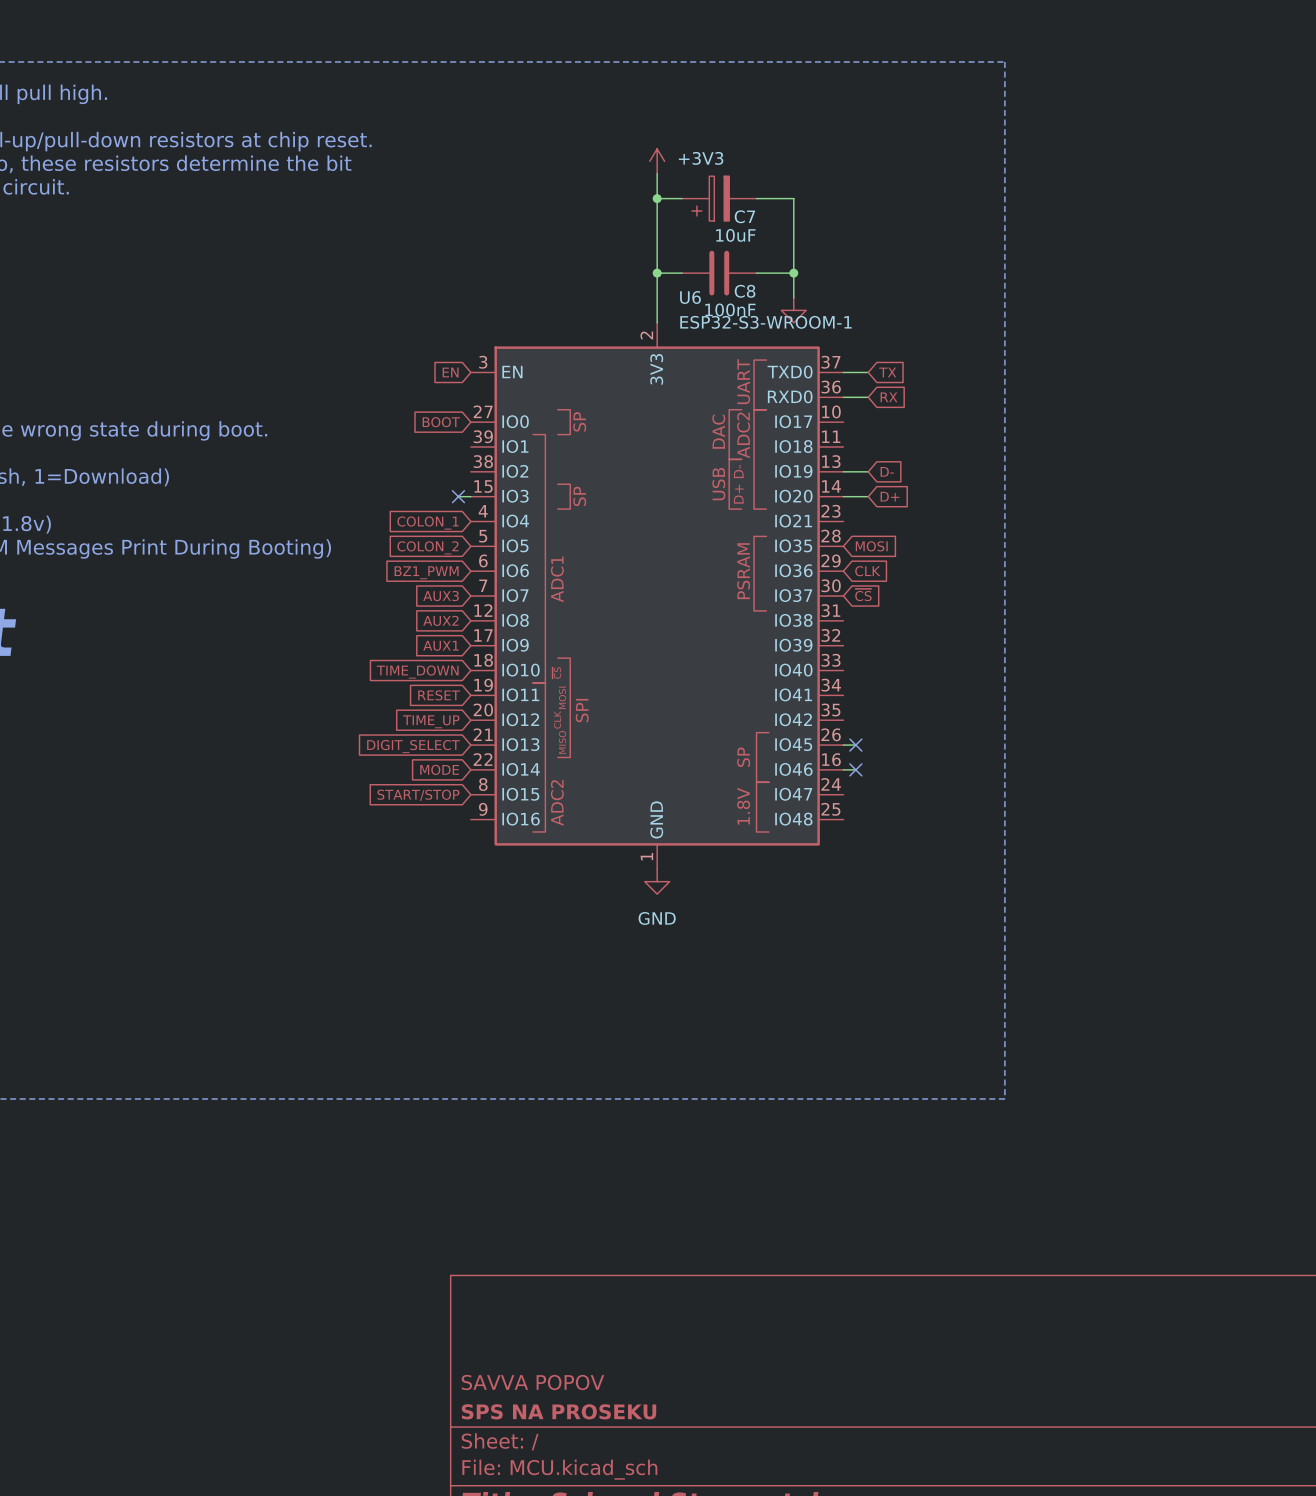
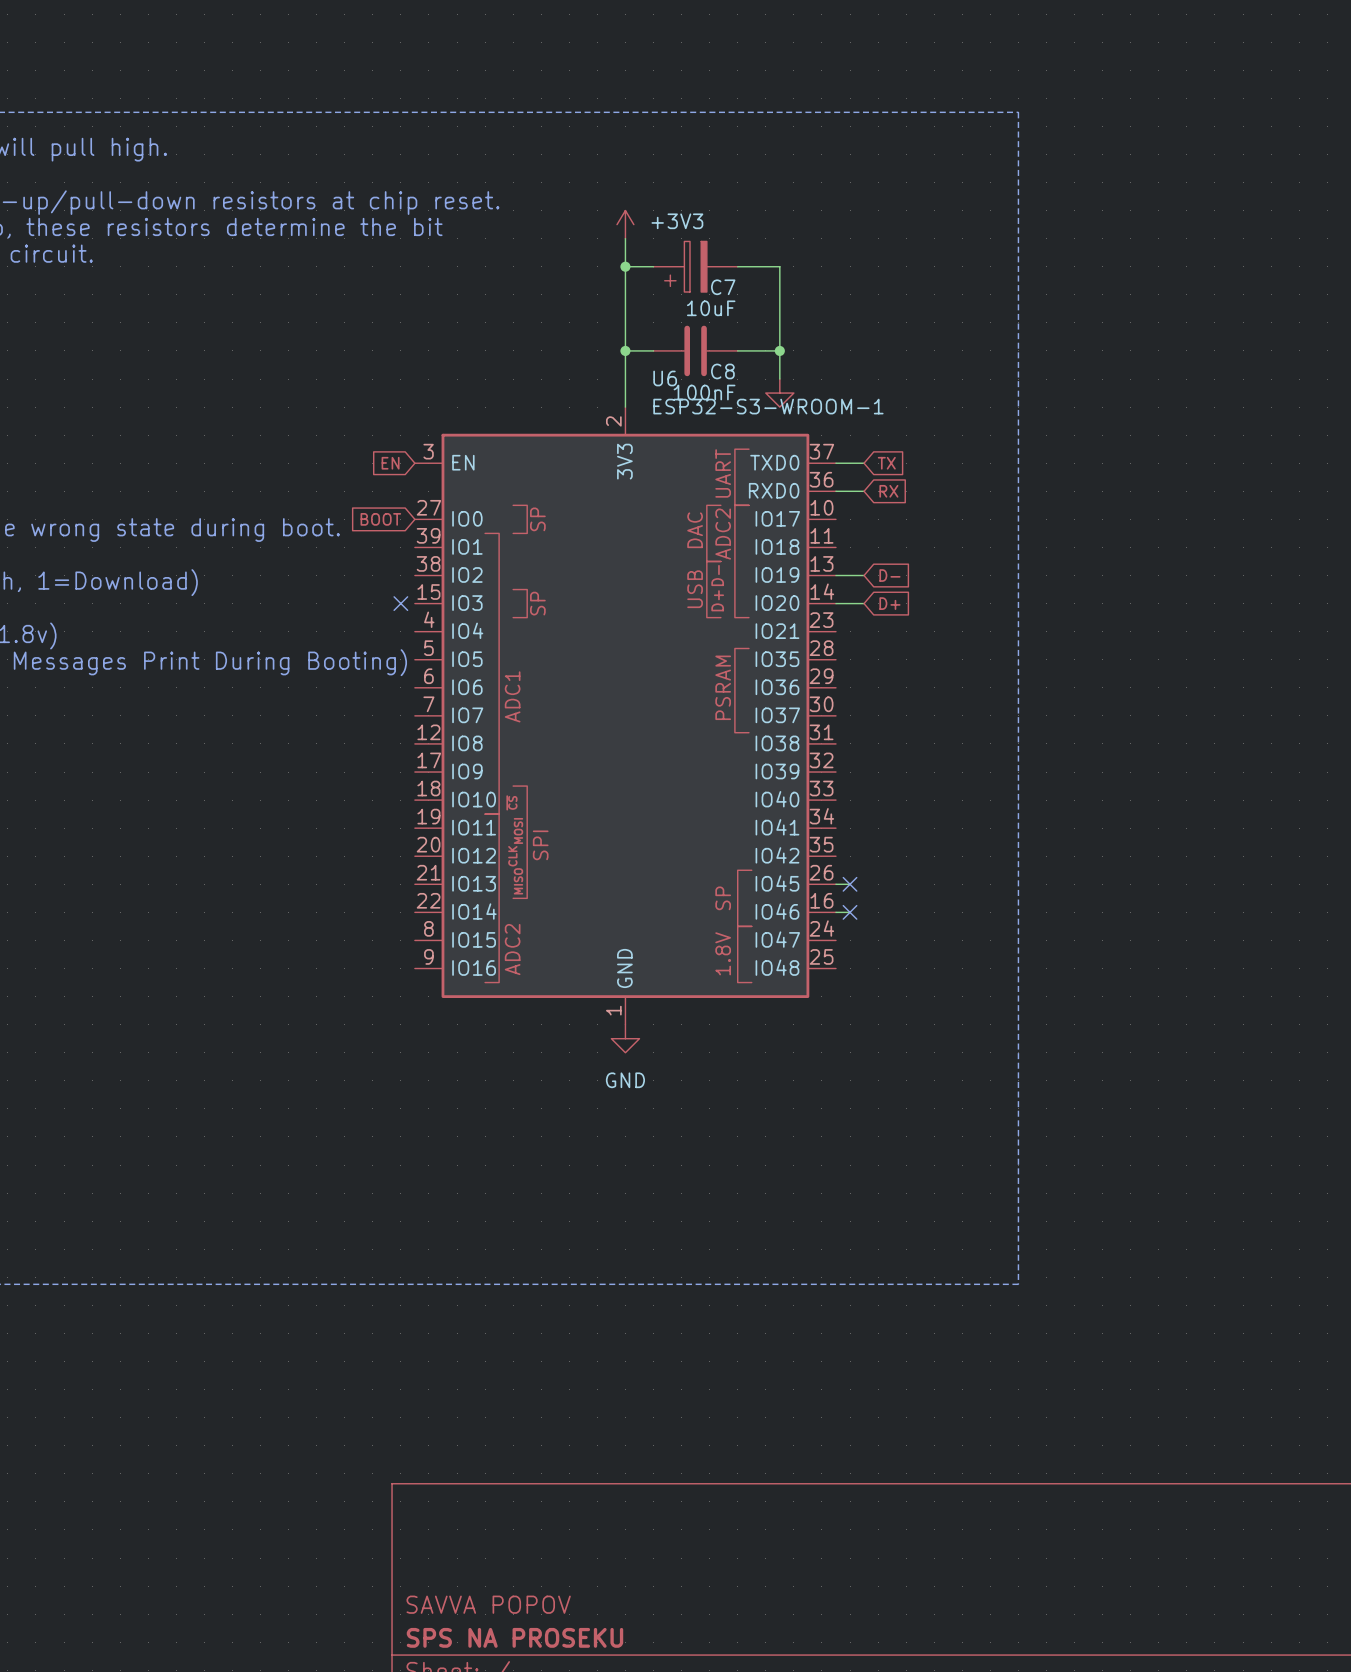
wire: (458, 496) (470, 496) -> none
global label: COLON_1 (428, 523) -> none
global label: MOSI (871, 546) -> none
global label: COLON_2 (427, 547) -> none
global label: CLK (867, 571) -> none
global label: BZ1_PWM (426, 572) -> none
global label: ~{CS} (863, 595) -> none
global label: AUX3 (441, 596) -> none
global label: AUX2 (440, 620) -> none
global label: AUX1 (440, 645) -> none
global label: TIME_DOWN (417, 672) -> none
global label: RESET (439, 695) -> none
global label: TIME_UP (431, 721) -> none
global label: DIGIT_SELECT (413, 746) -> none
global label: MODE (439, 769) -> none
global label: START/STOP (418, 795) -> none

